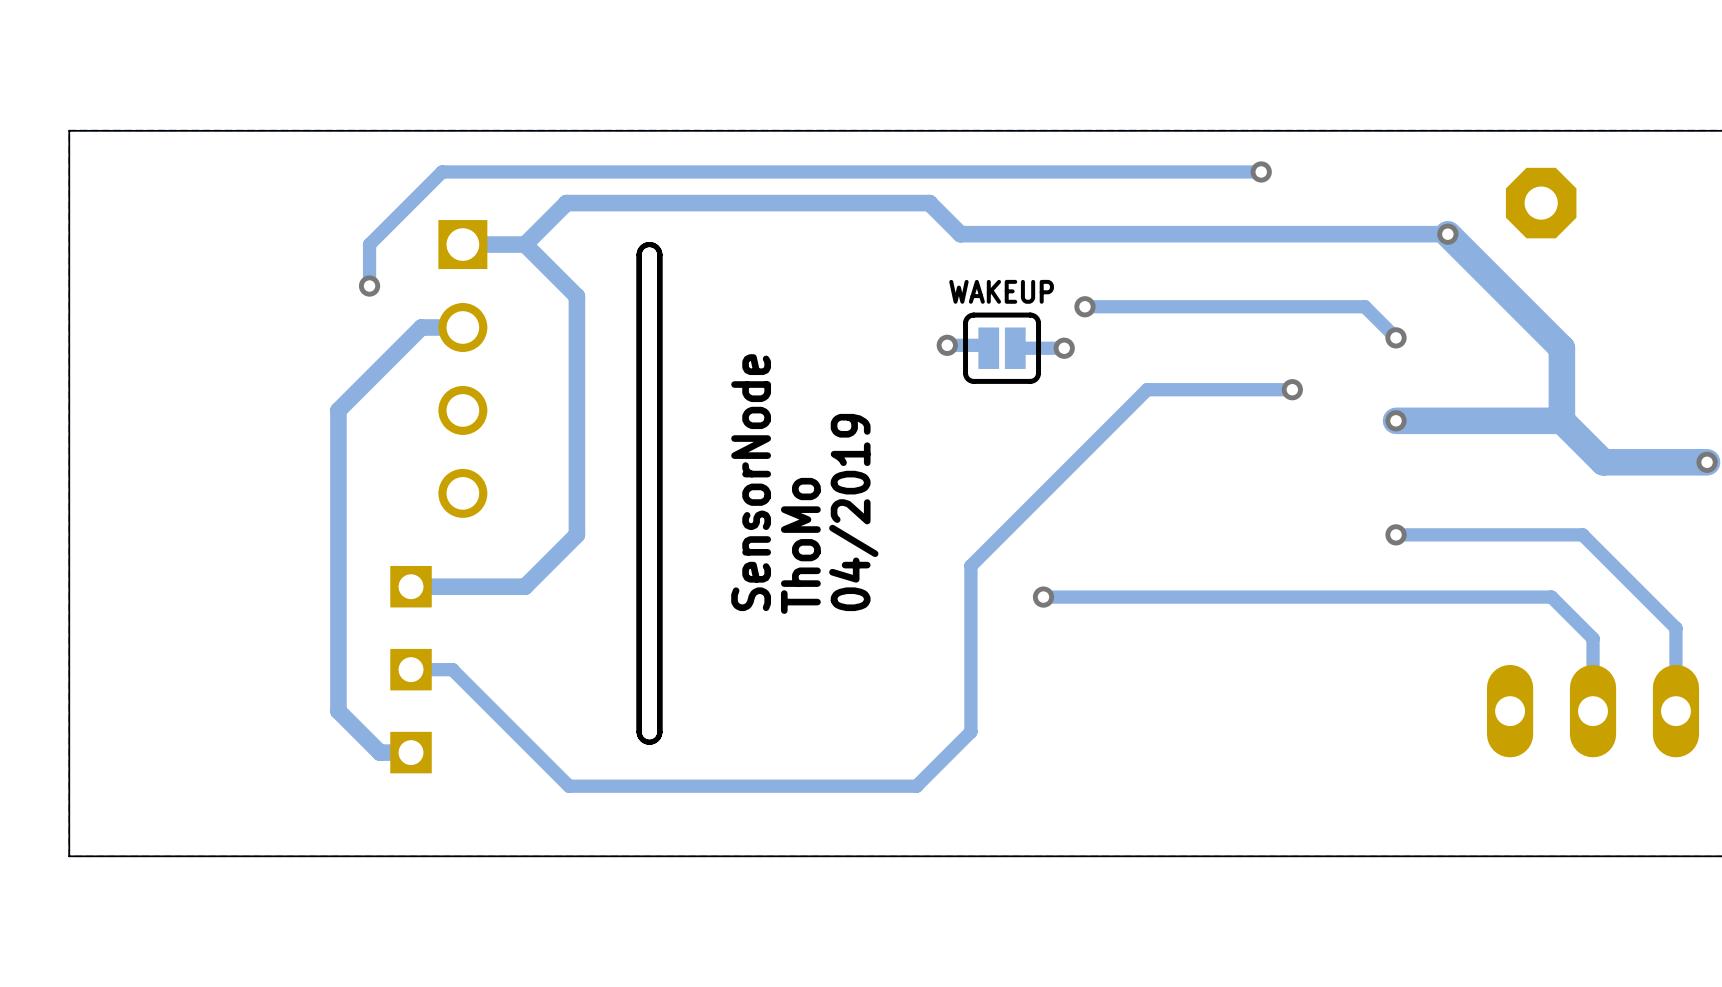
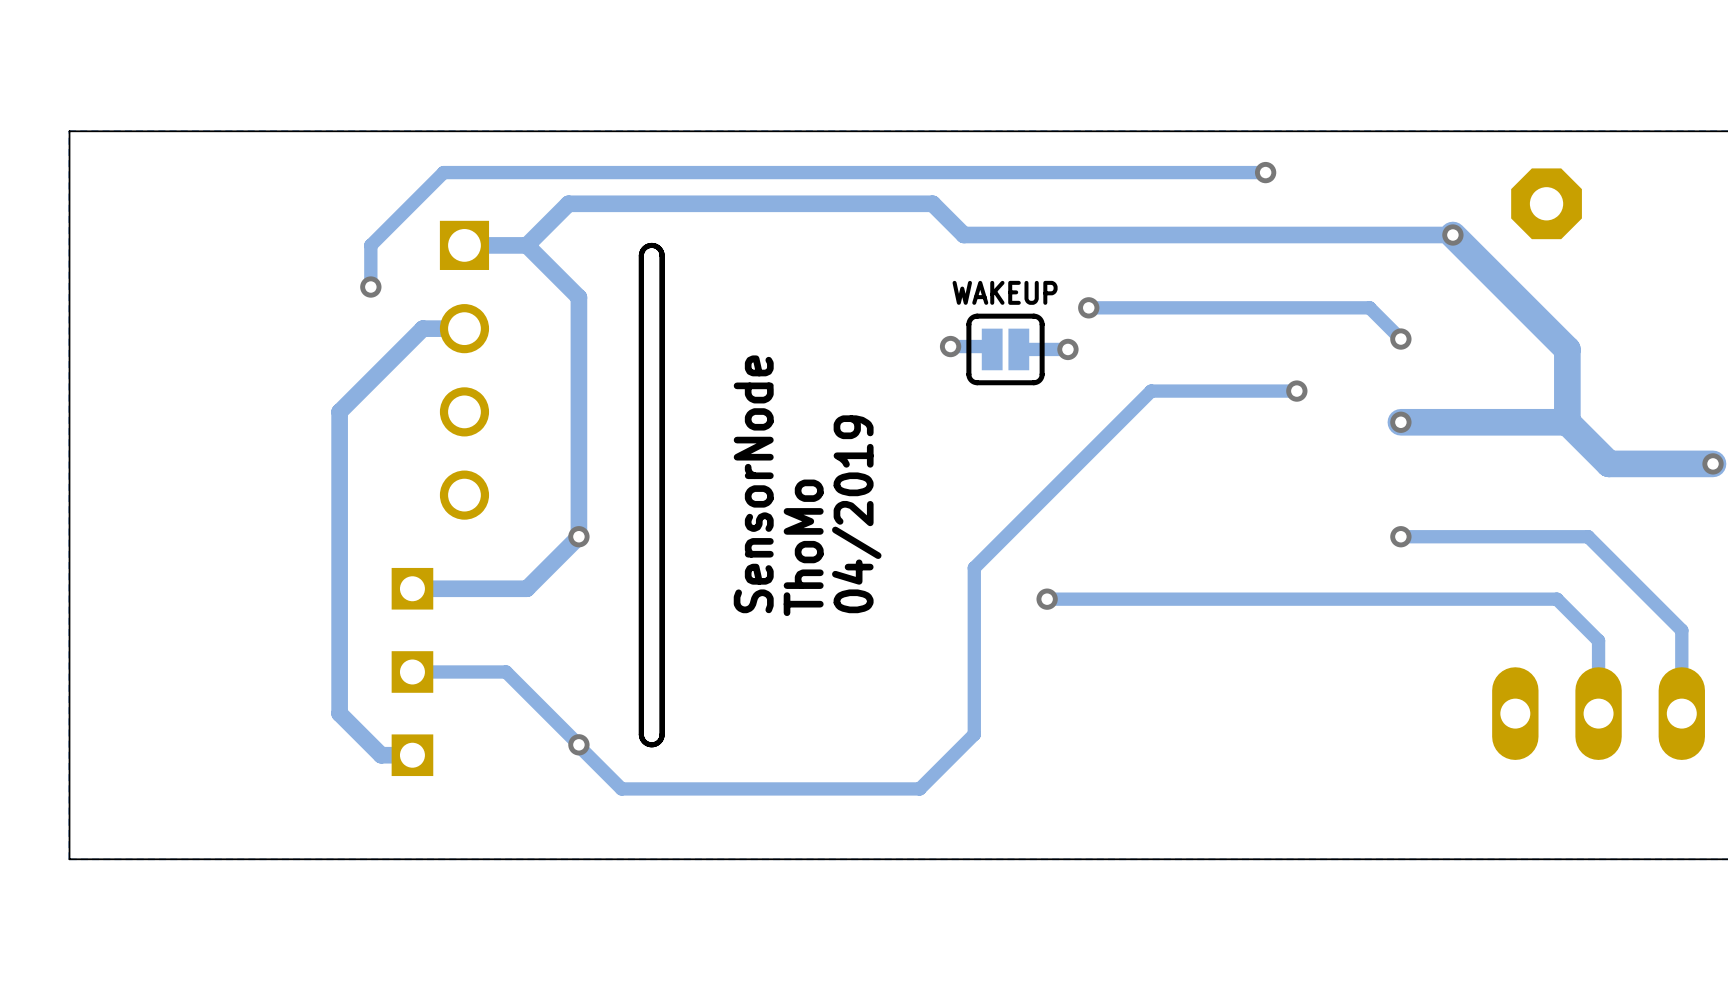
via: none -> (578, 536)
track: (452, 669) (569, 786) (619, 786) -> (454, 671) (506, 671) (621, 788)
via: none -> (578, 744)

